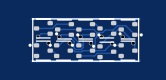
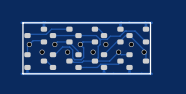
part footprint: [33, 18, 59, 39] -> [24, 26, 48, 45]
part footprint: [97, 18, 122, 39] -> [100, 26, 124, 45]
part footprint: [54, 19, 80, 40] -> [49, 26, 73, 45]
part footprint: [76, 19, 101, 40] -> [75, 26, 99, 45]
part footprint: [118, 19, 143, 40] -> [126, 26, 150, 45]
part footprint: [28, 40, 53, 61] -> [24, 52, 48, 70]
part footprint: [48, 40, 73, 61] -> [49, 52, 73, 70]
part footprint: [70, 40, 96, 61] -> [75, 52, 99, 70]
part footprint: [113, 40, 138, 61] -> [126, 52, 150, 70]
part footprint: [92, 41, 117, 62] -> [100, 52, 124, 70]

